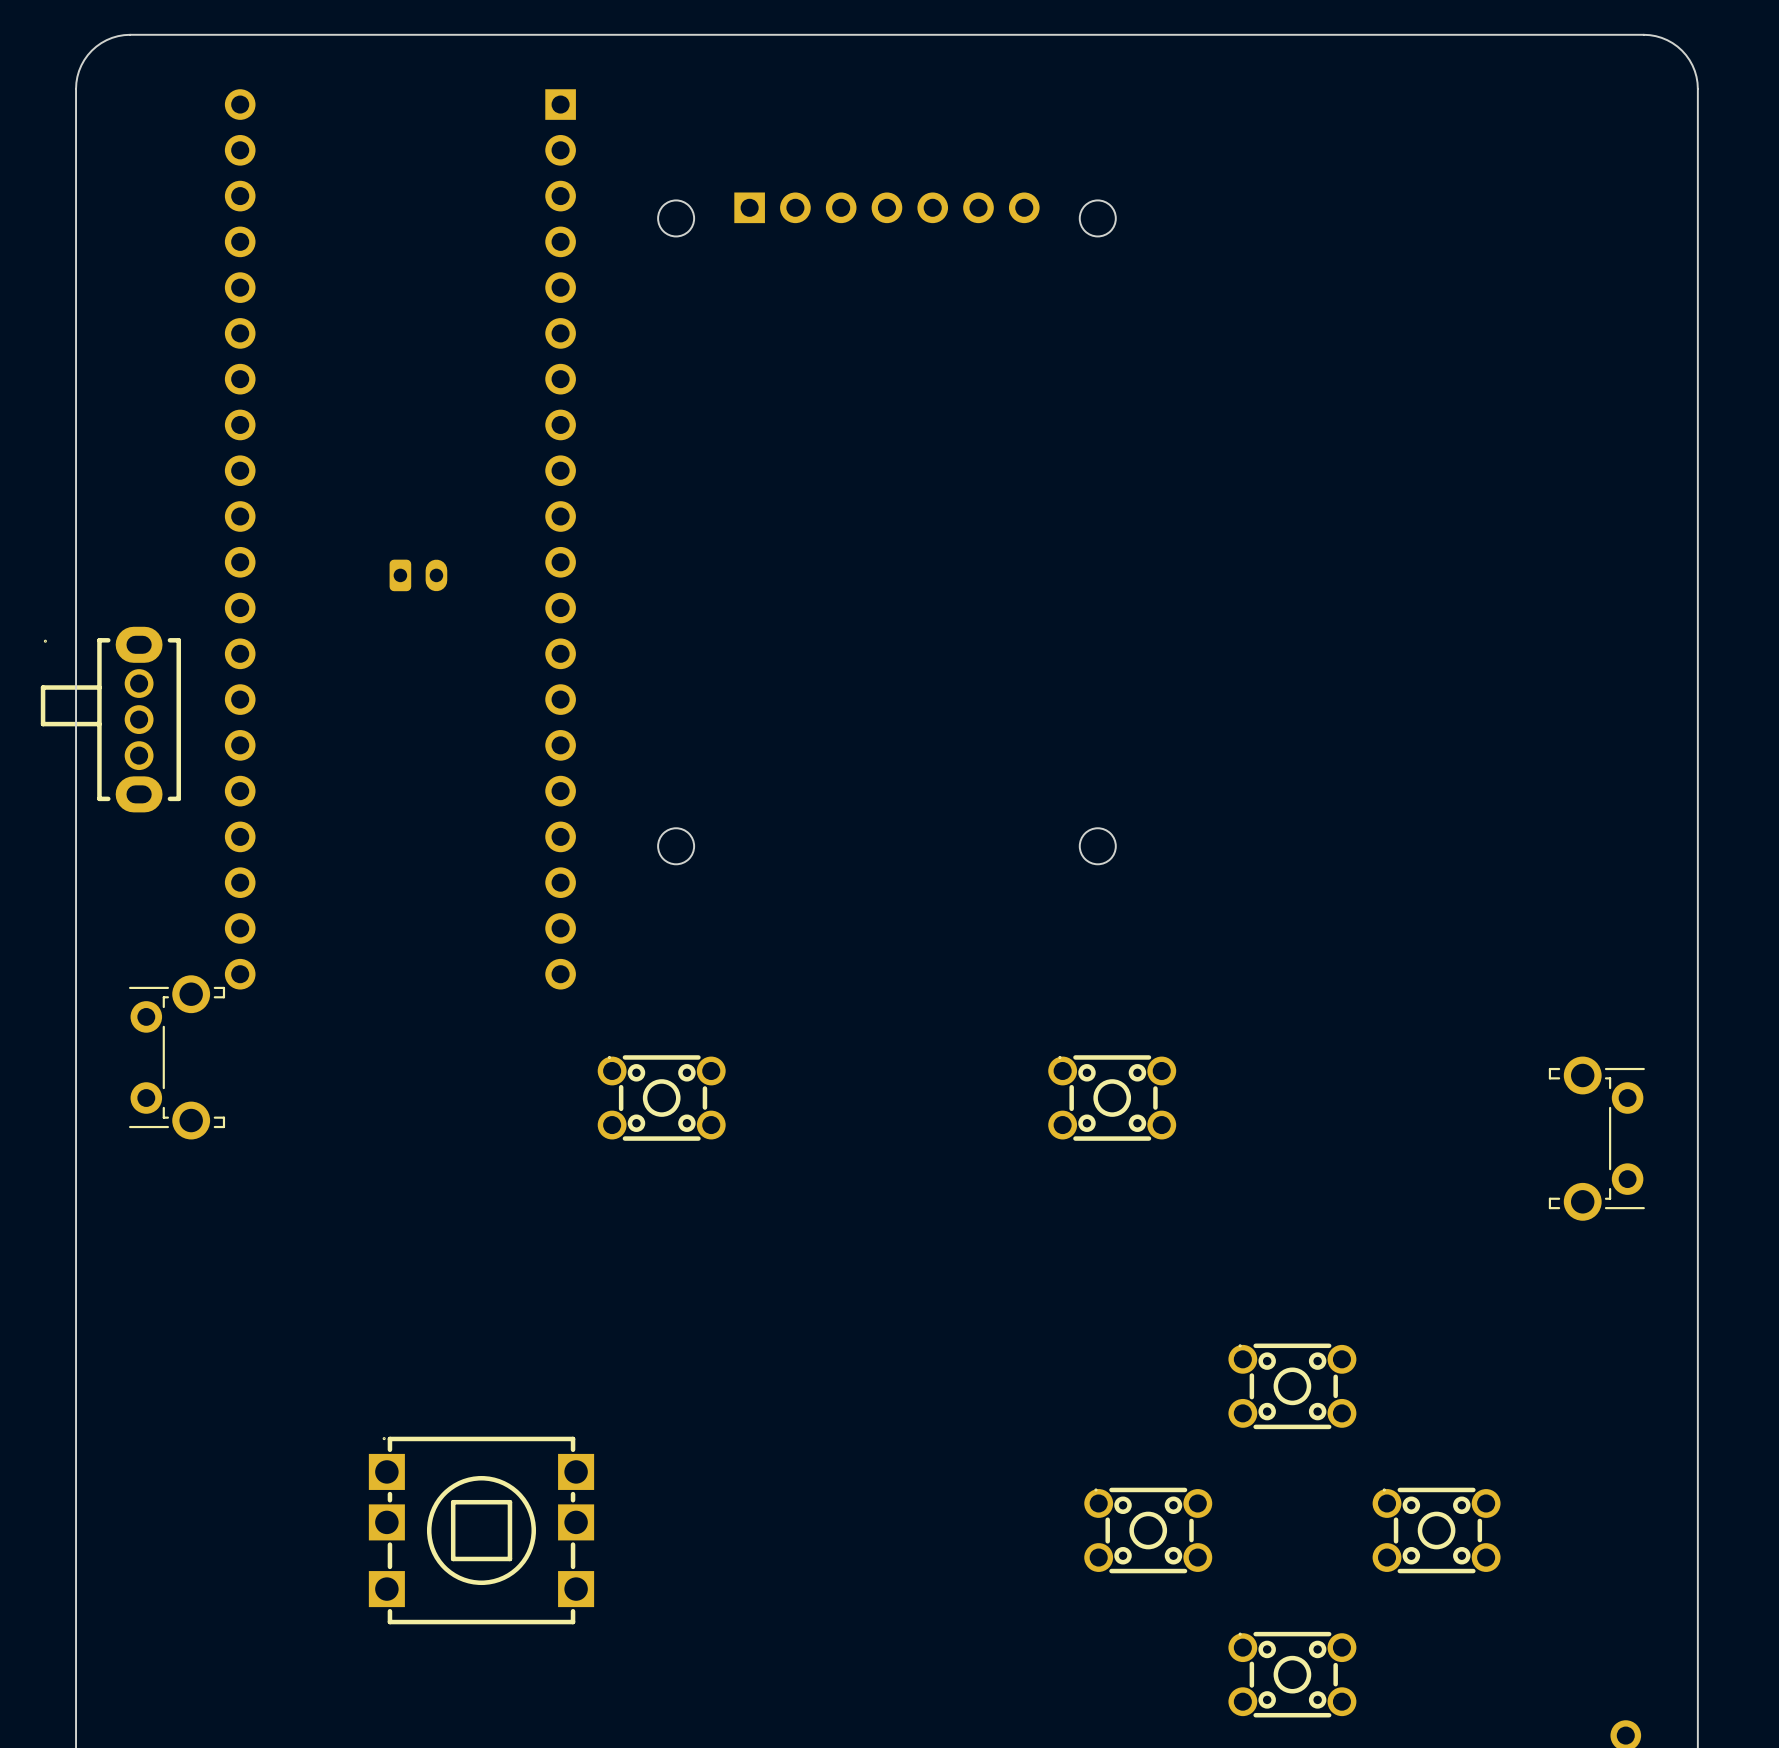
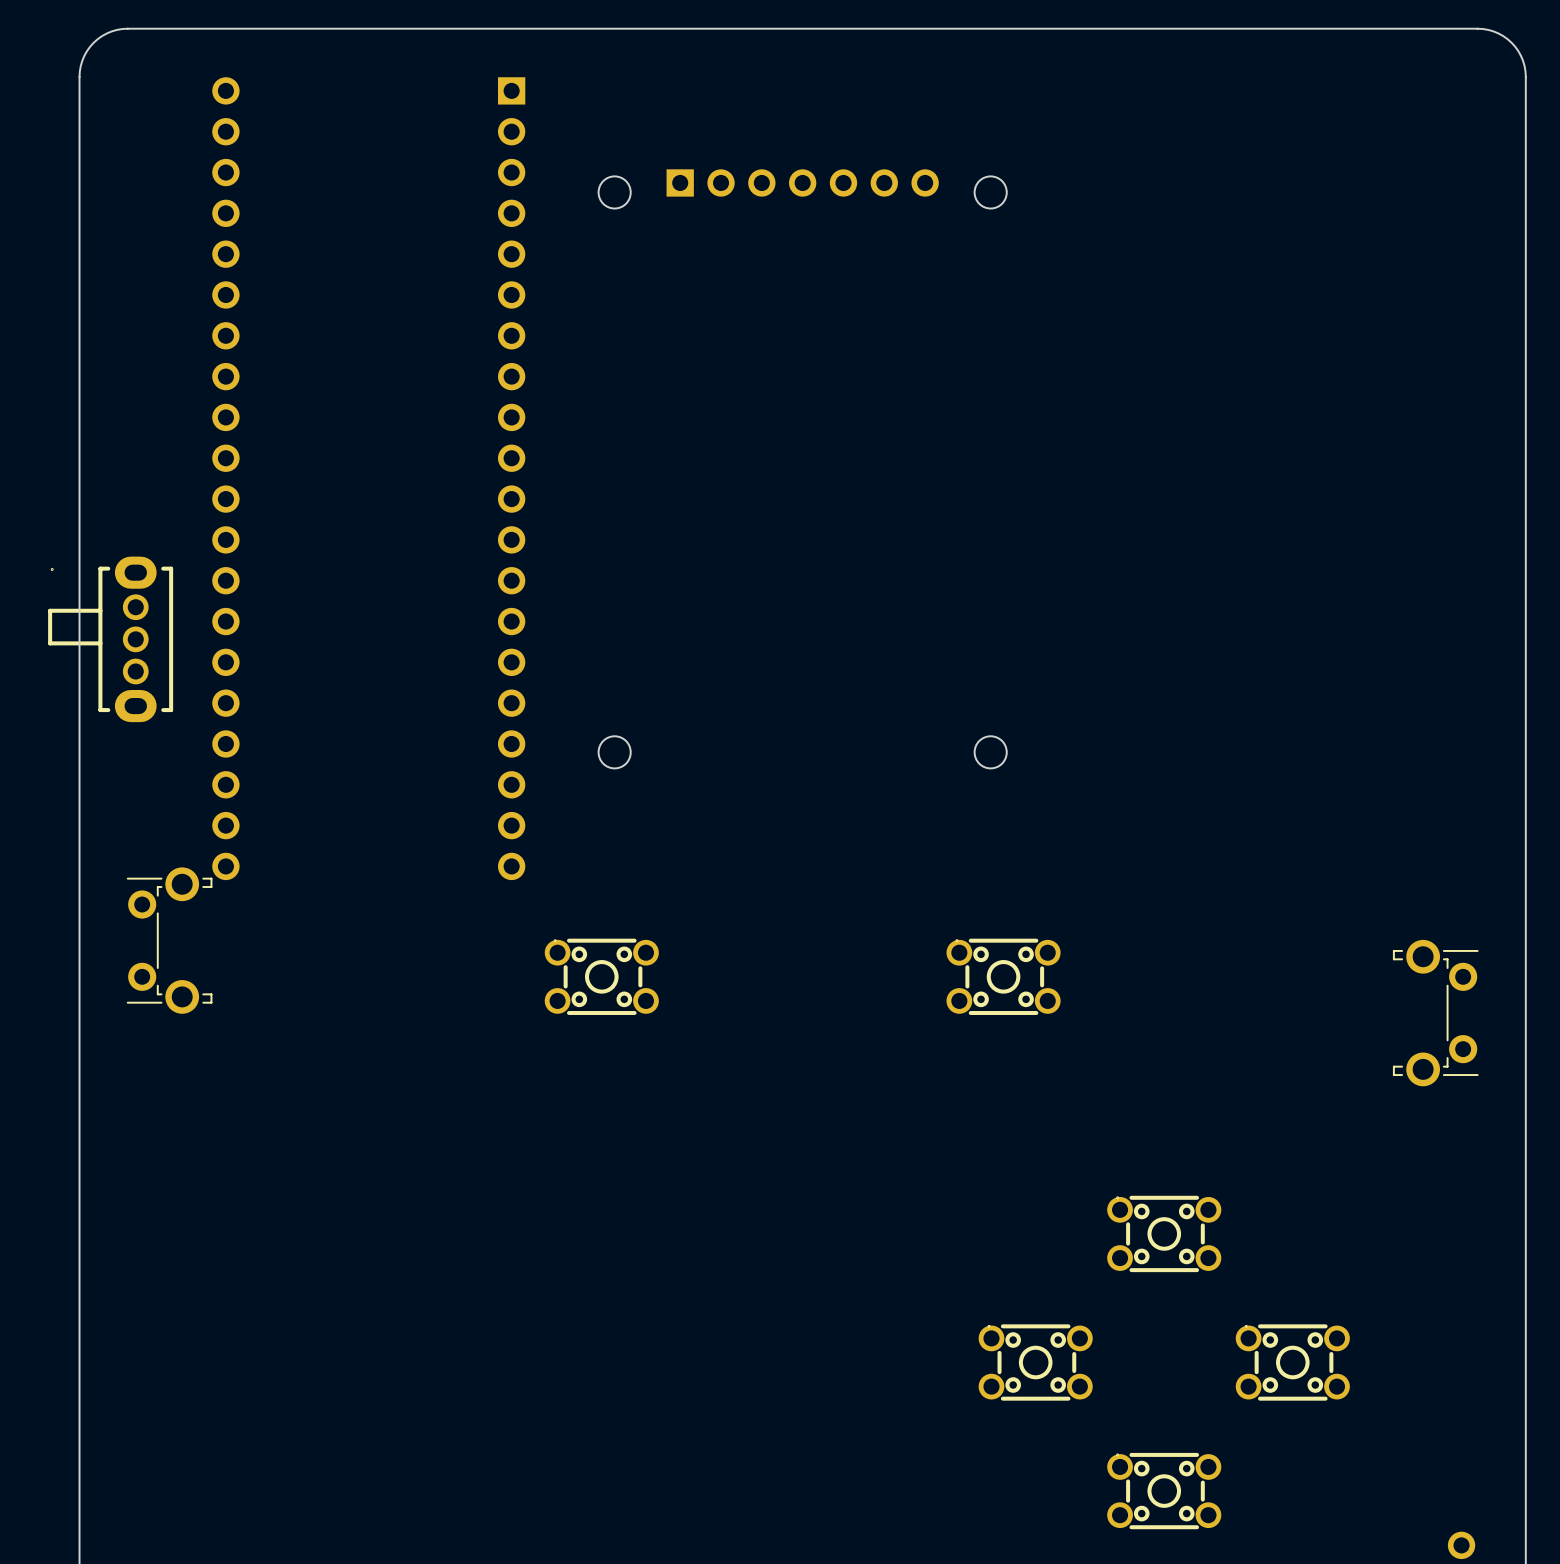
part: (418, 575) -> none
part: (481, 1530) -> none

